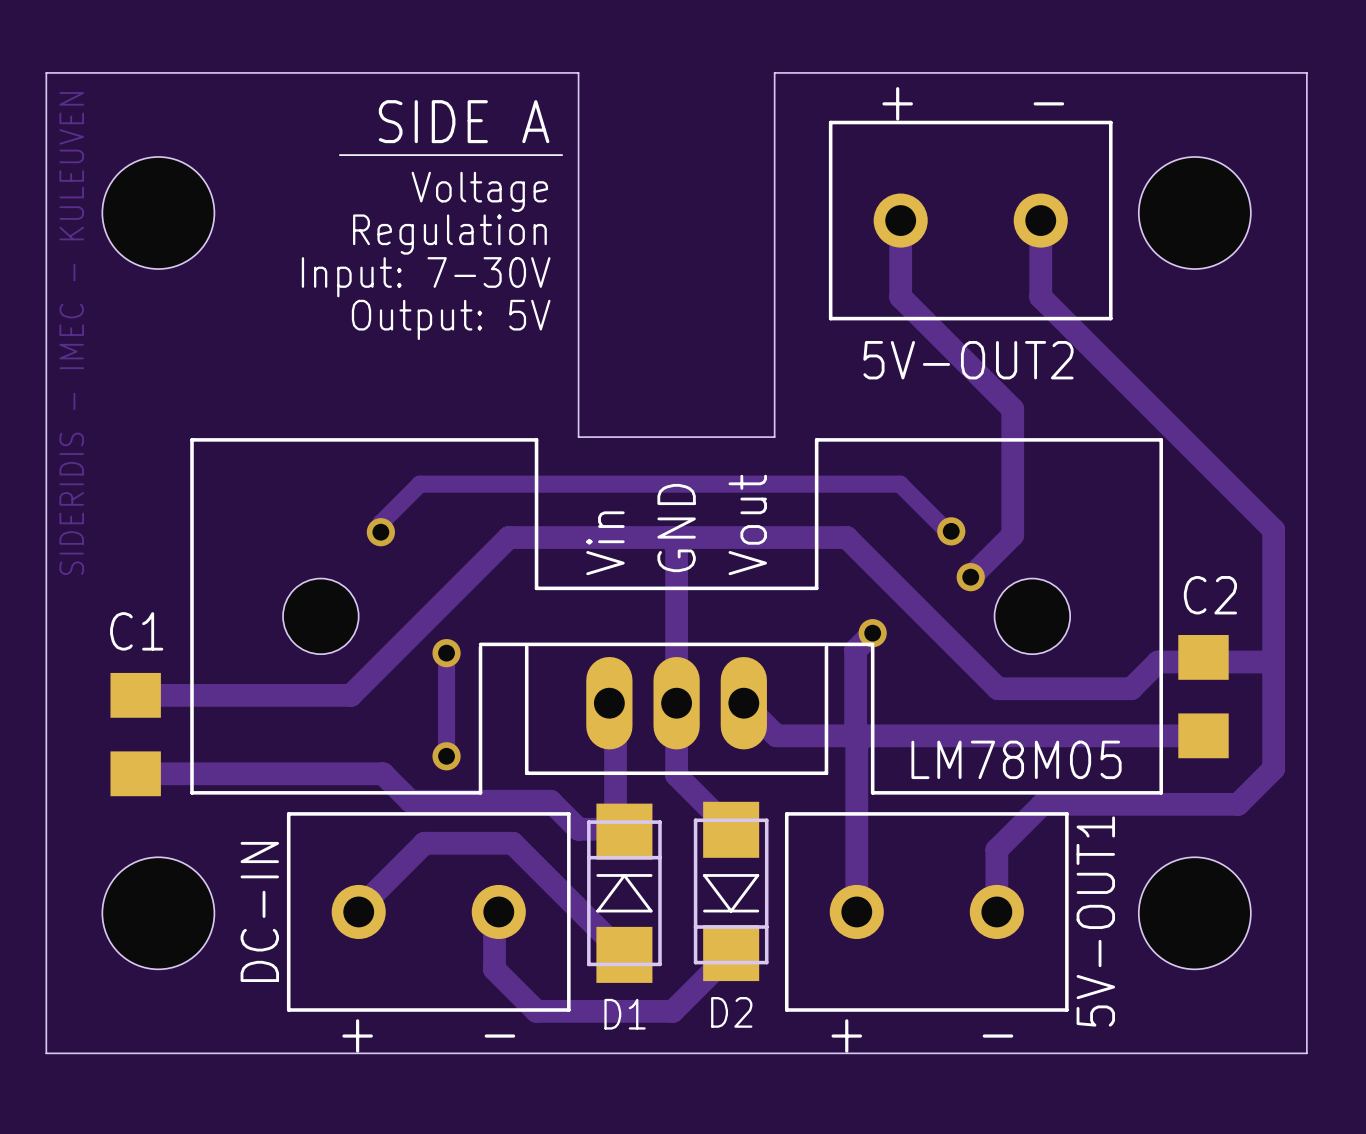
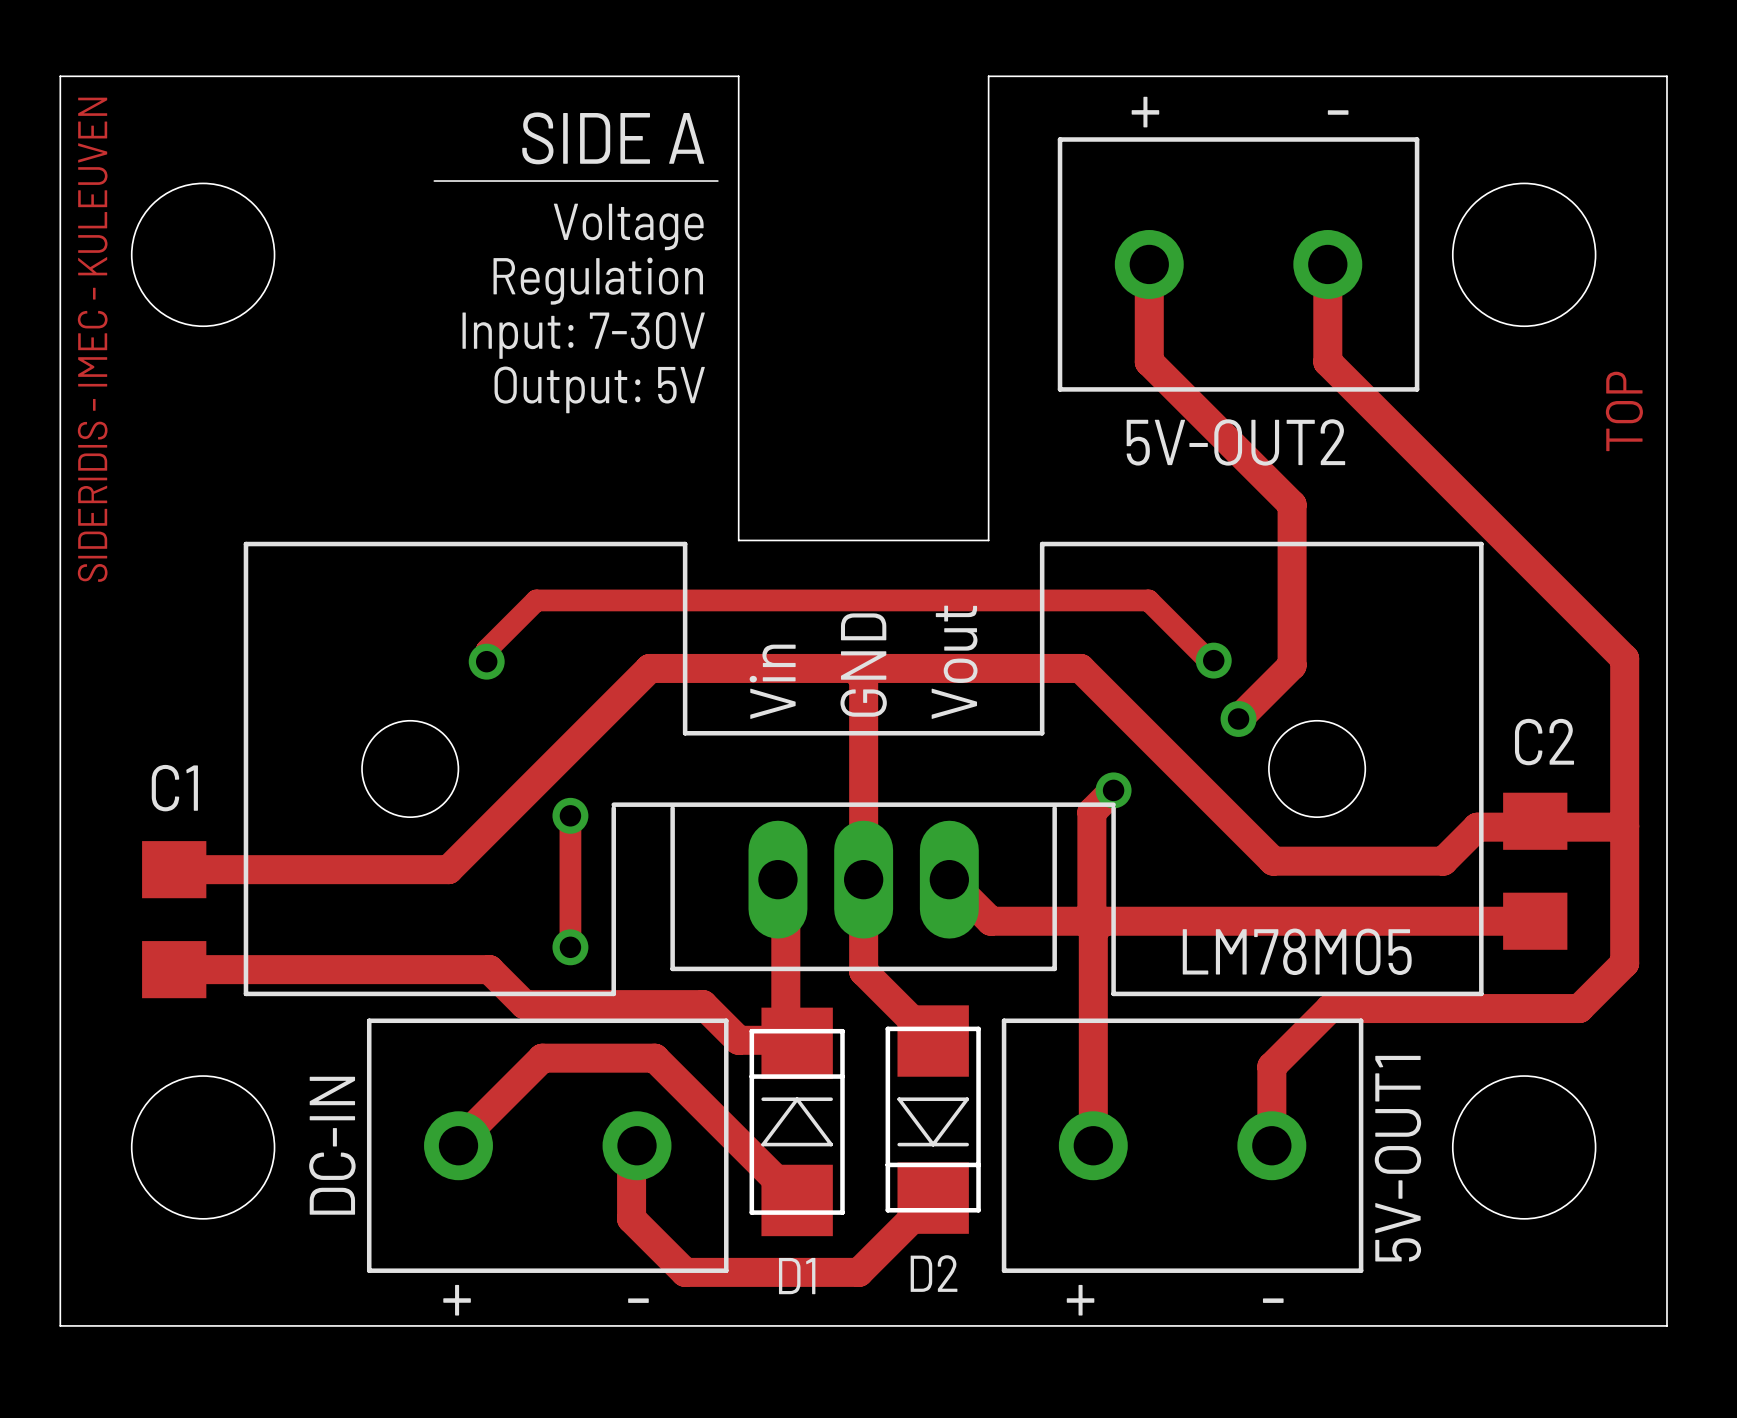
text: none -> TOP (1624, 411)

